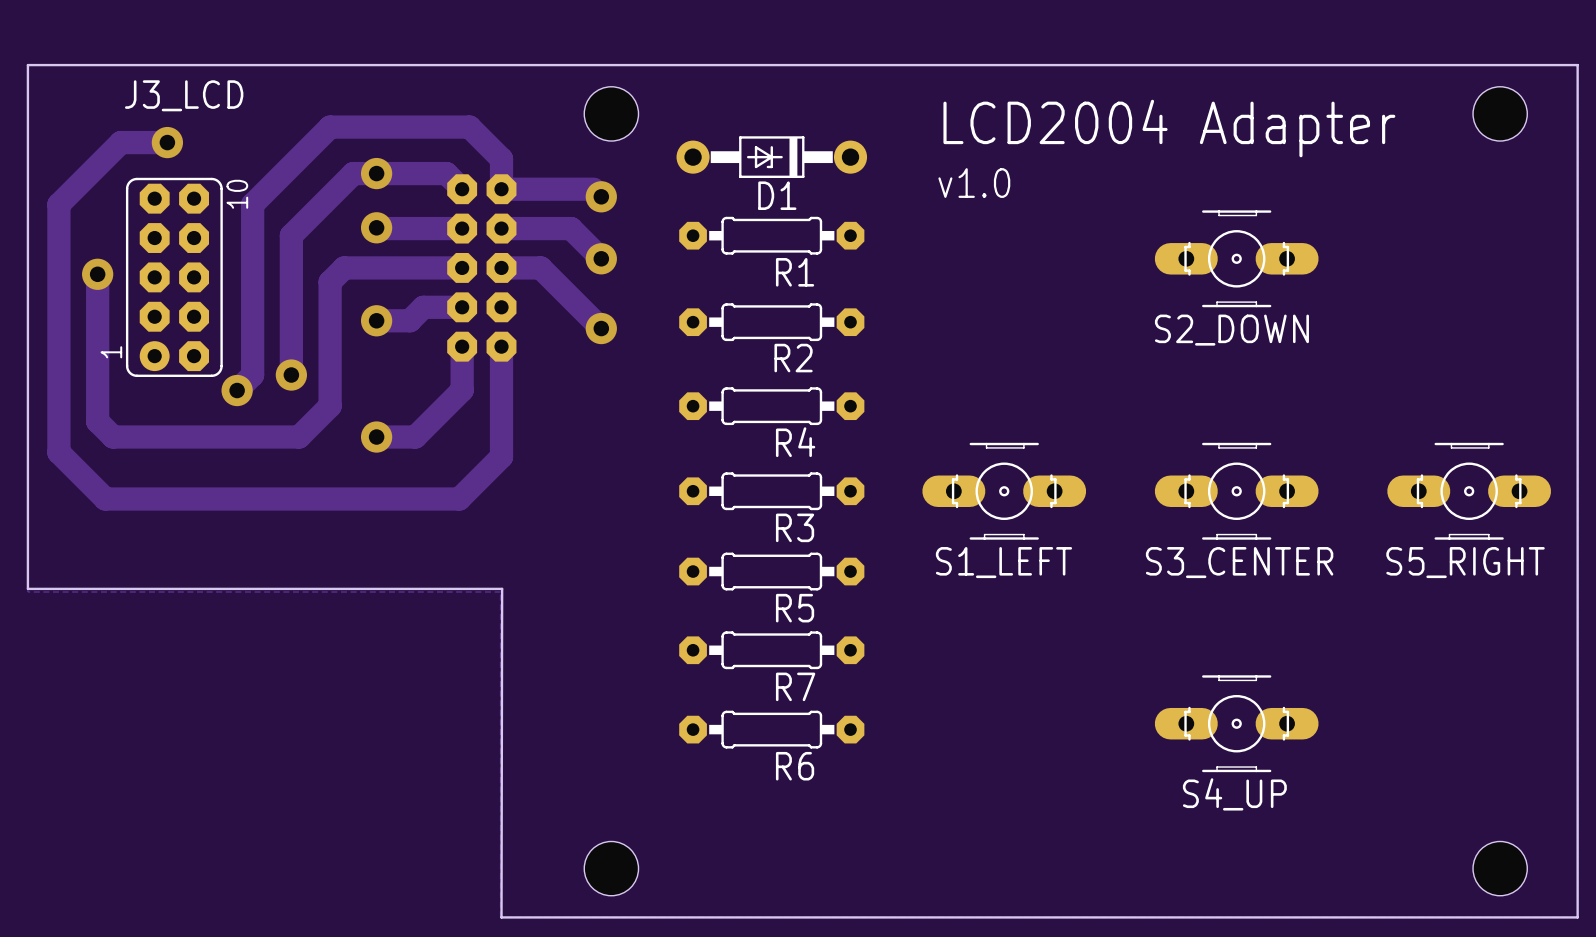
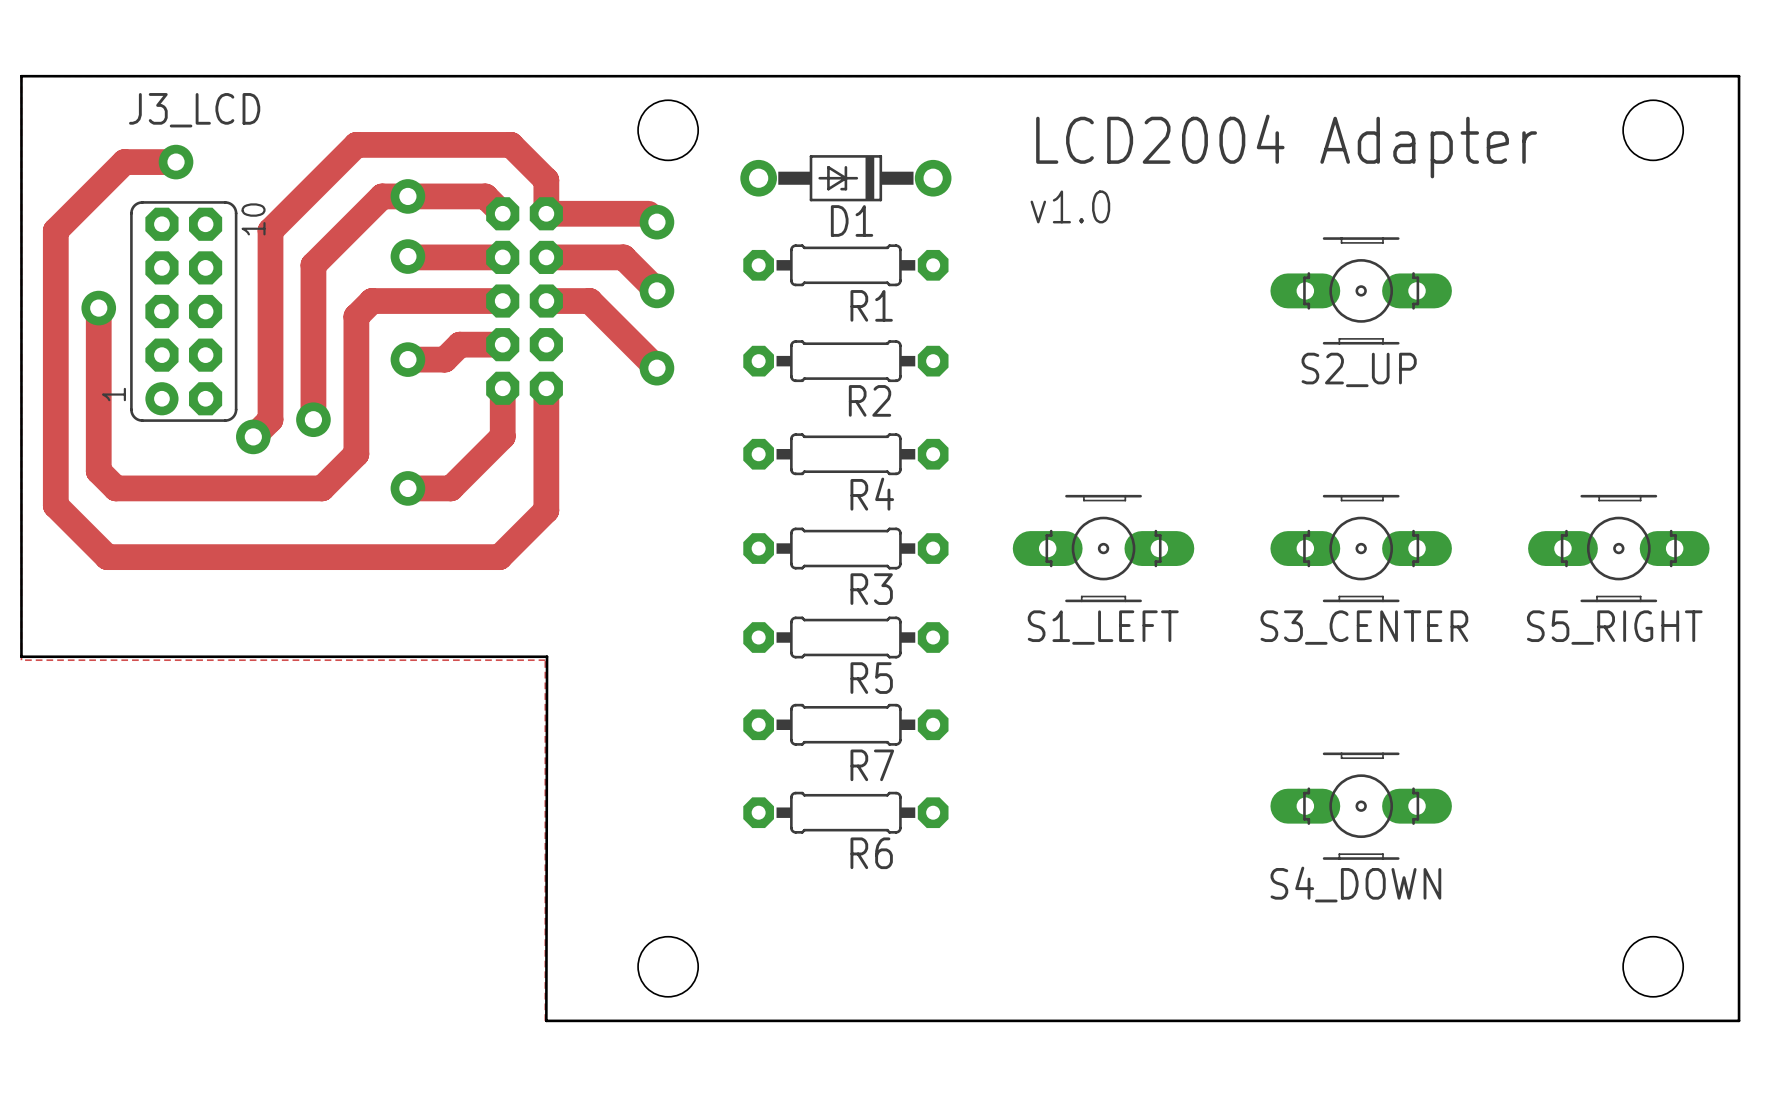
S2_DOWN name: S2_DOWN (1231, 330) -> S2_UP (1359, 369)
S4_UP name: S4_UP (1234, 794) -> S4_DOWN (1355, 884)

